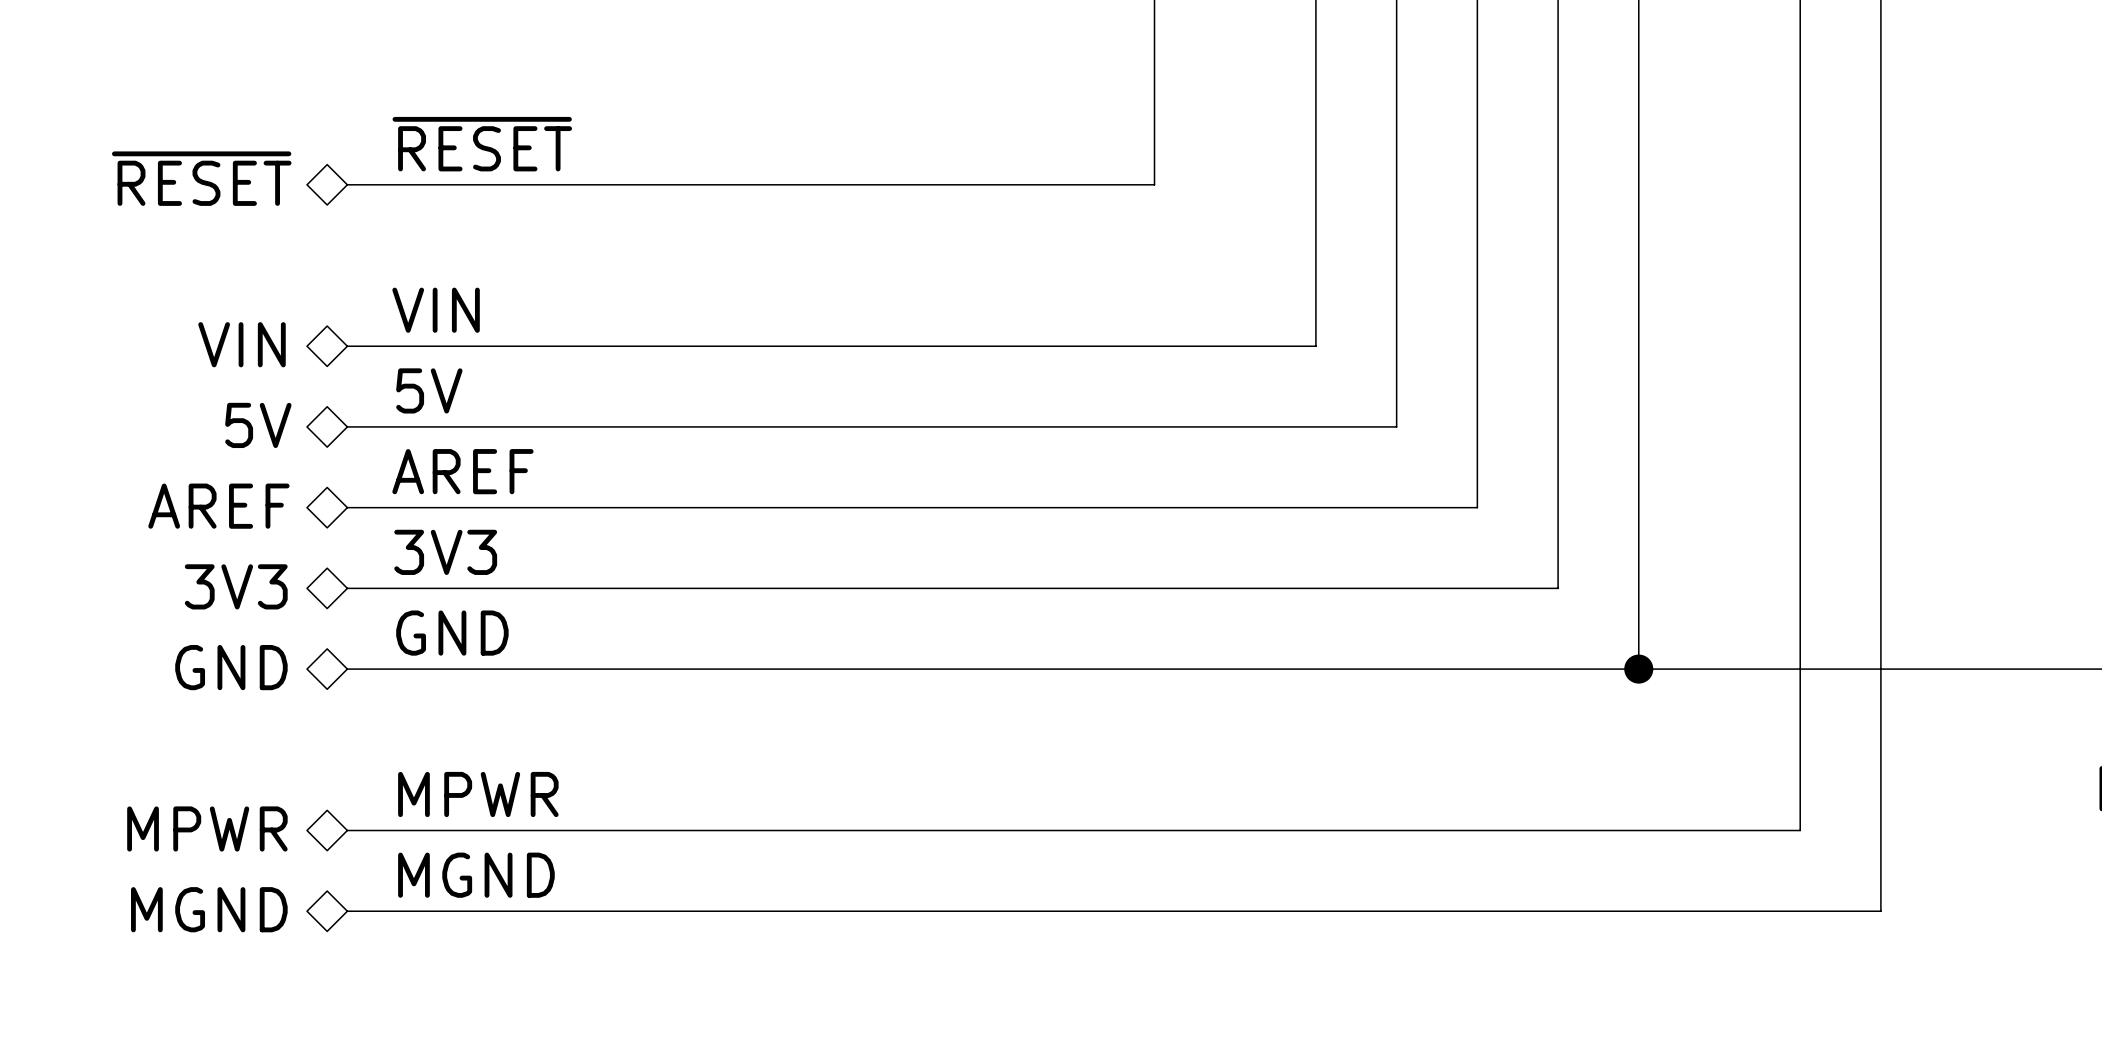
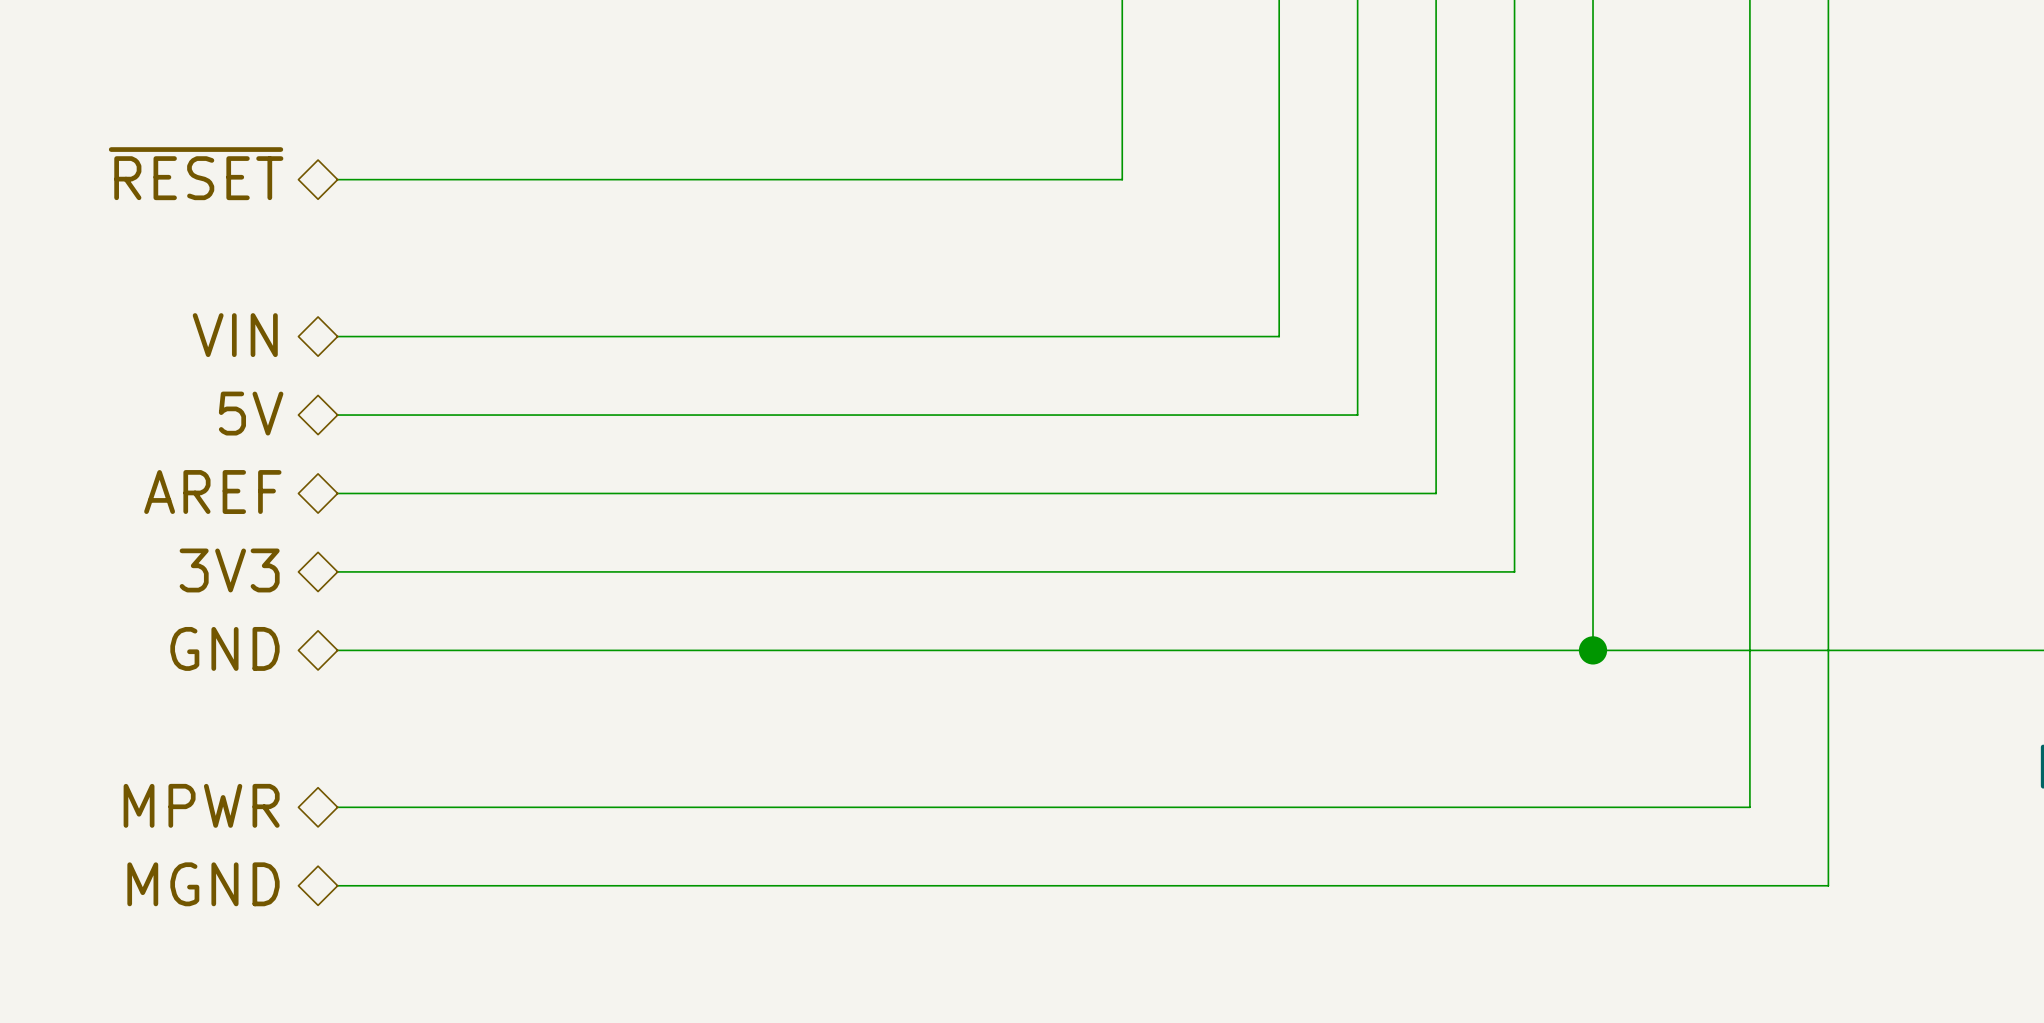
label: ~{RESET} (482, 144) -> none
label: VIN (436, 310) -> none
label: 5V (429, 390) -> none
label: AREF (462, 471) -> none
label: 3V3 (445, 552) -> none
label: GND (452, 633) -> none
label: MPWR (478, 794) -> none
label: MGND (476, 875) -> none

